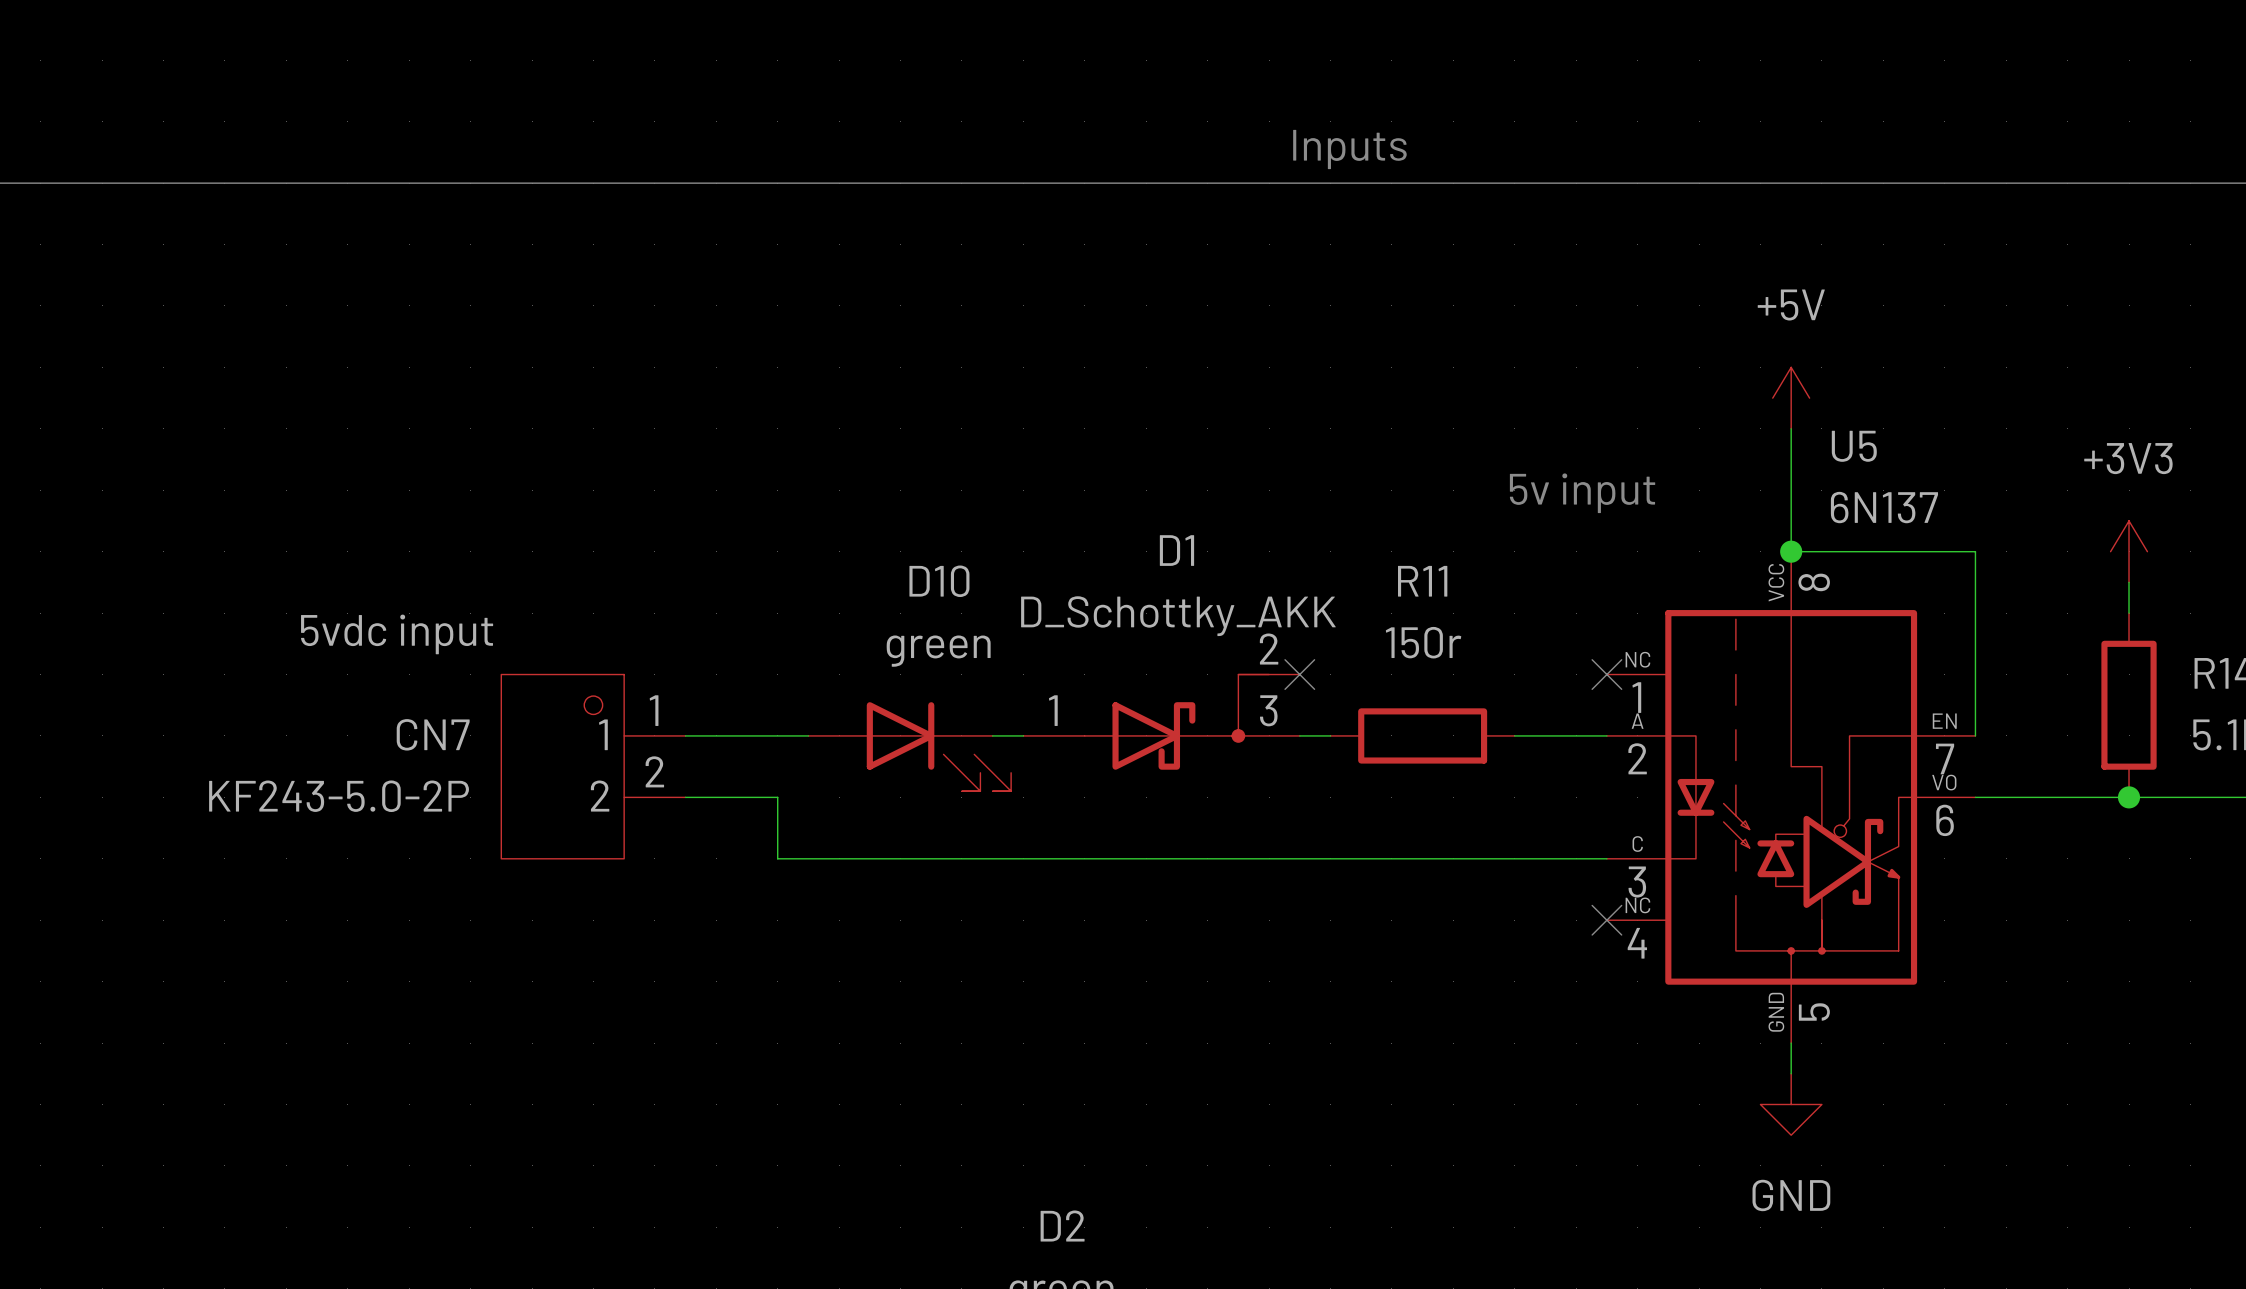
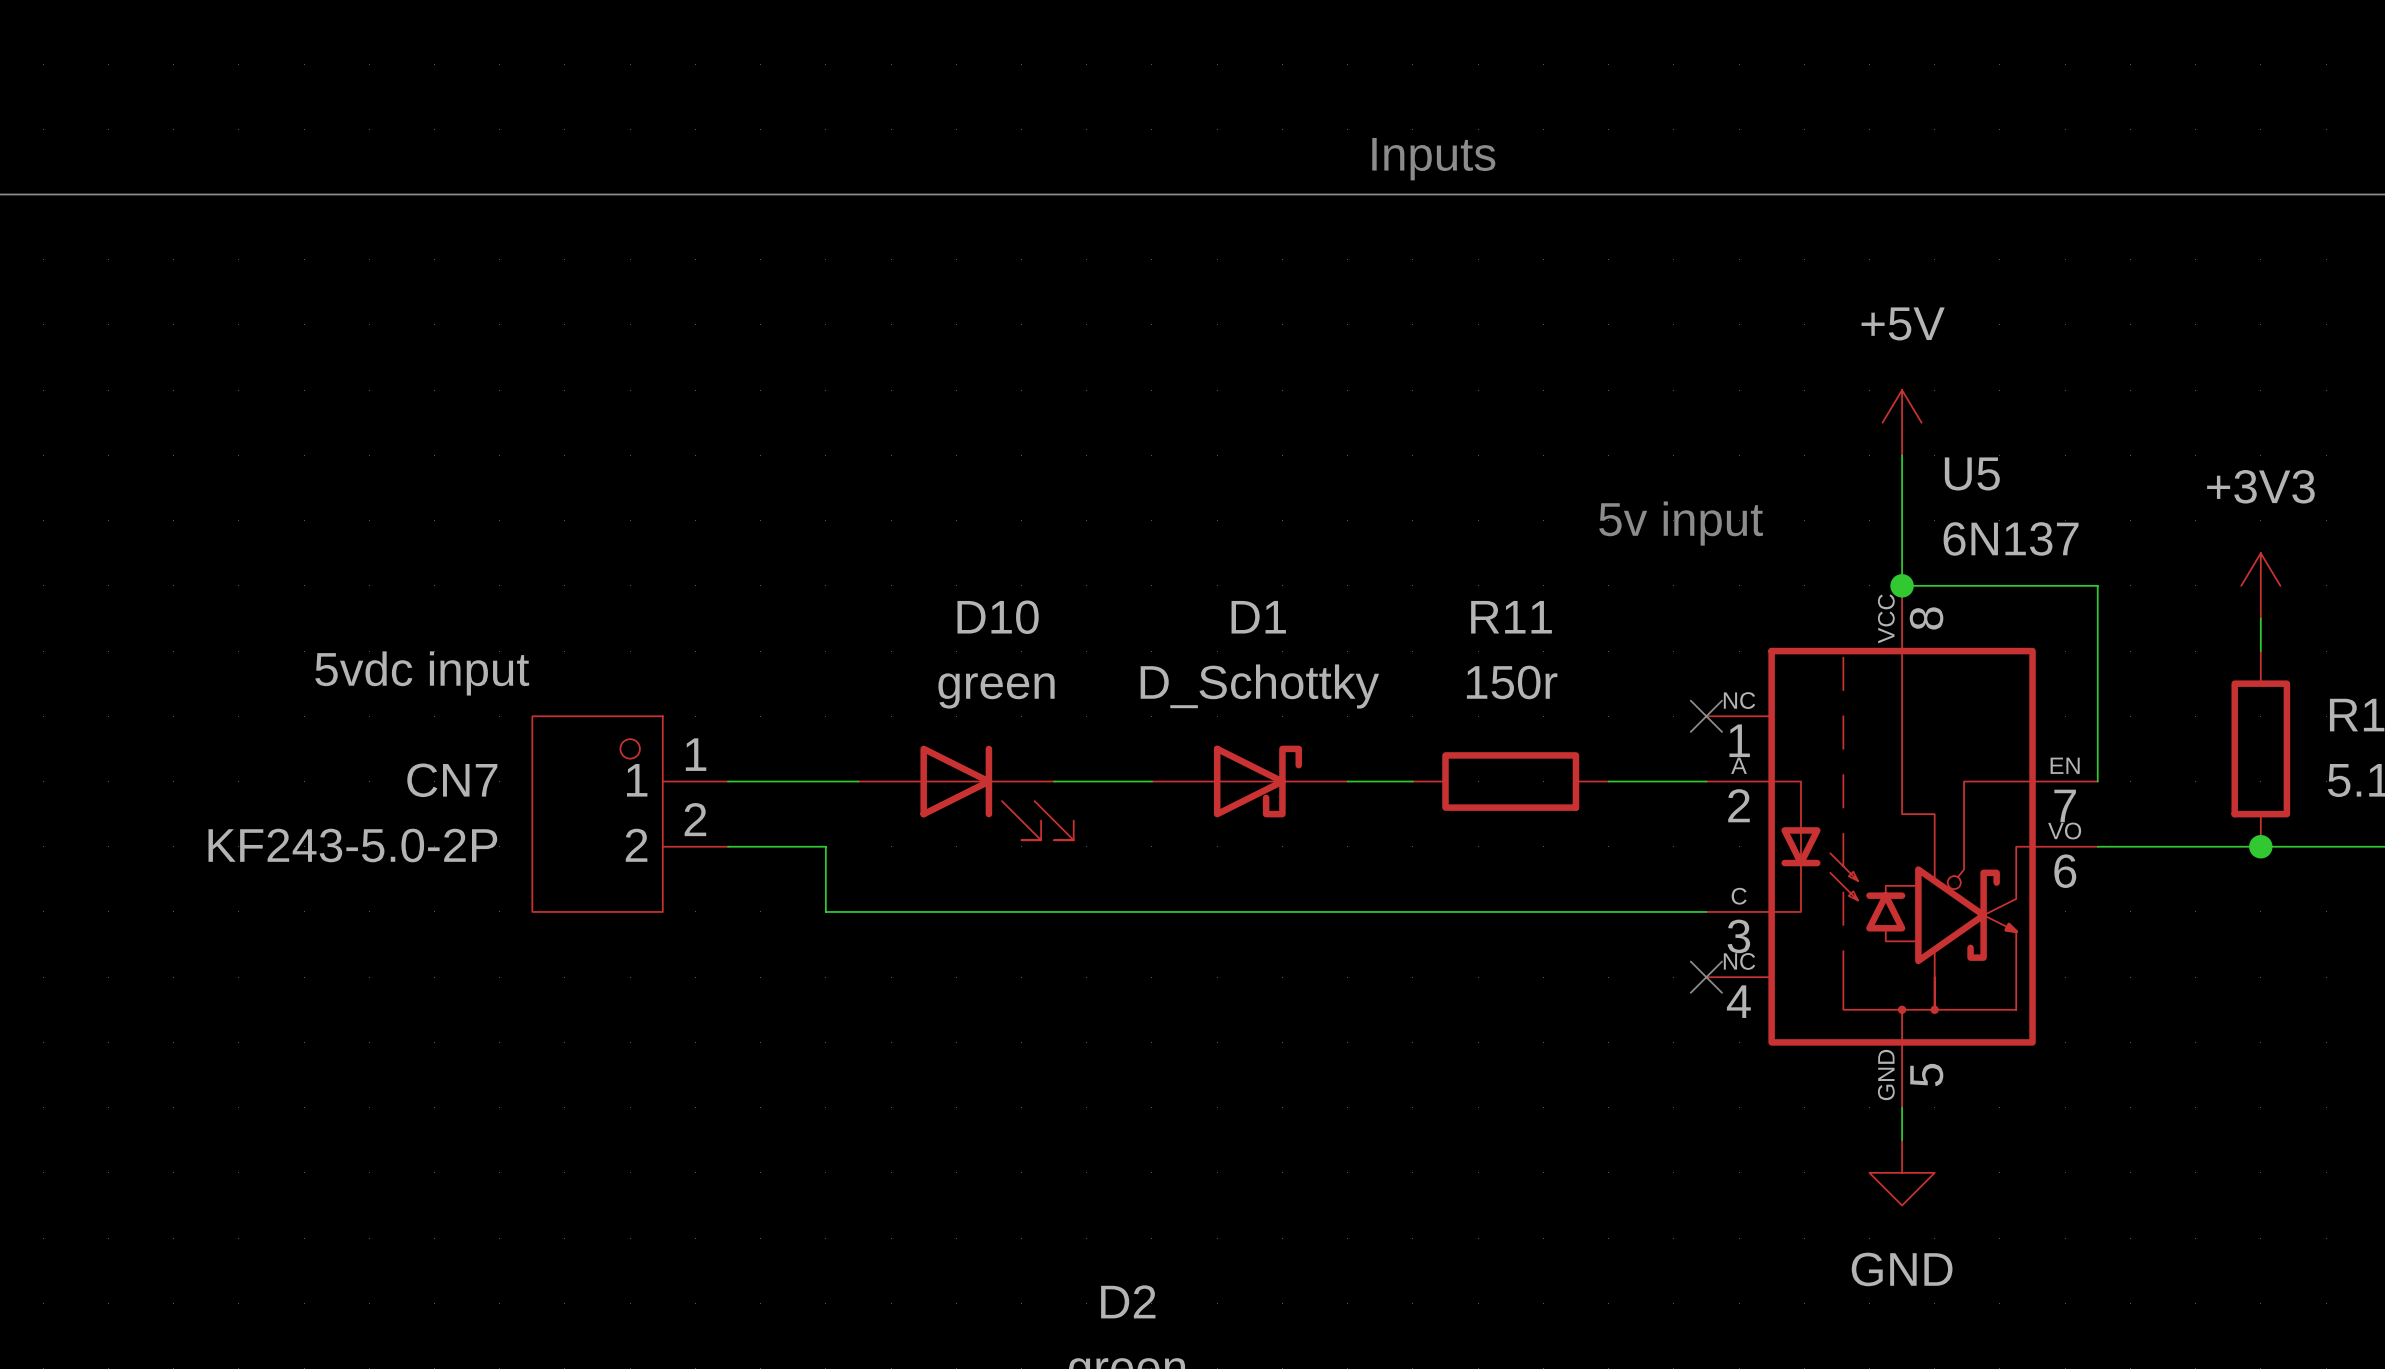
D1 value: D_Schottky_AKK (1178, 616) -> D_Schottky (1259, 686)
D1 symbol: [1023, 674, 1300, 770] -> [1151, 745, 1348, 818]
no-connect mark: (1299, 674) -> none

